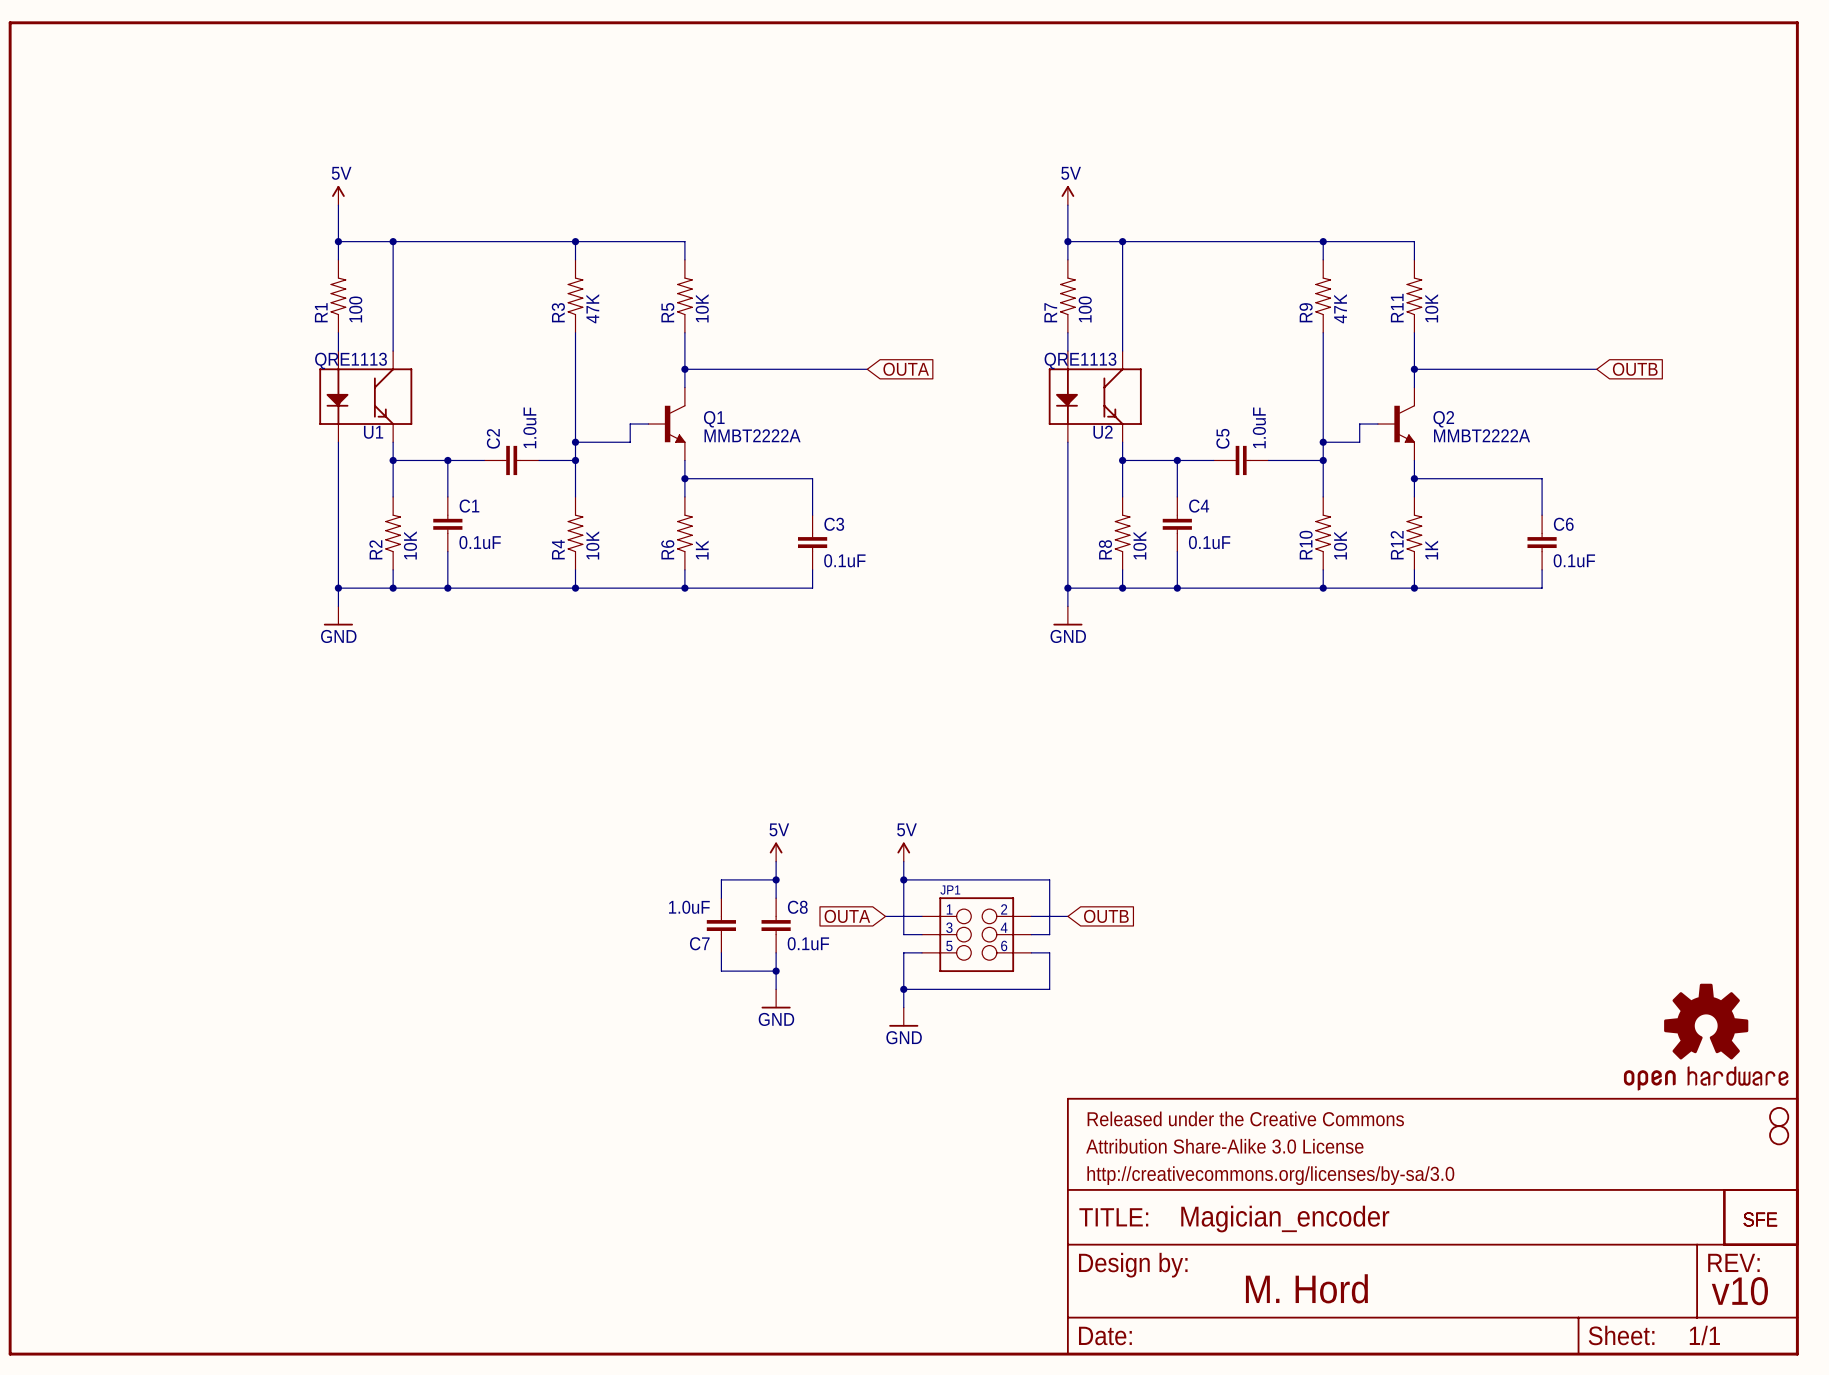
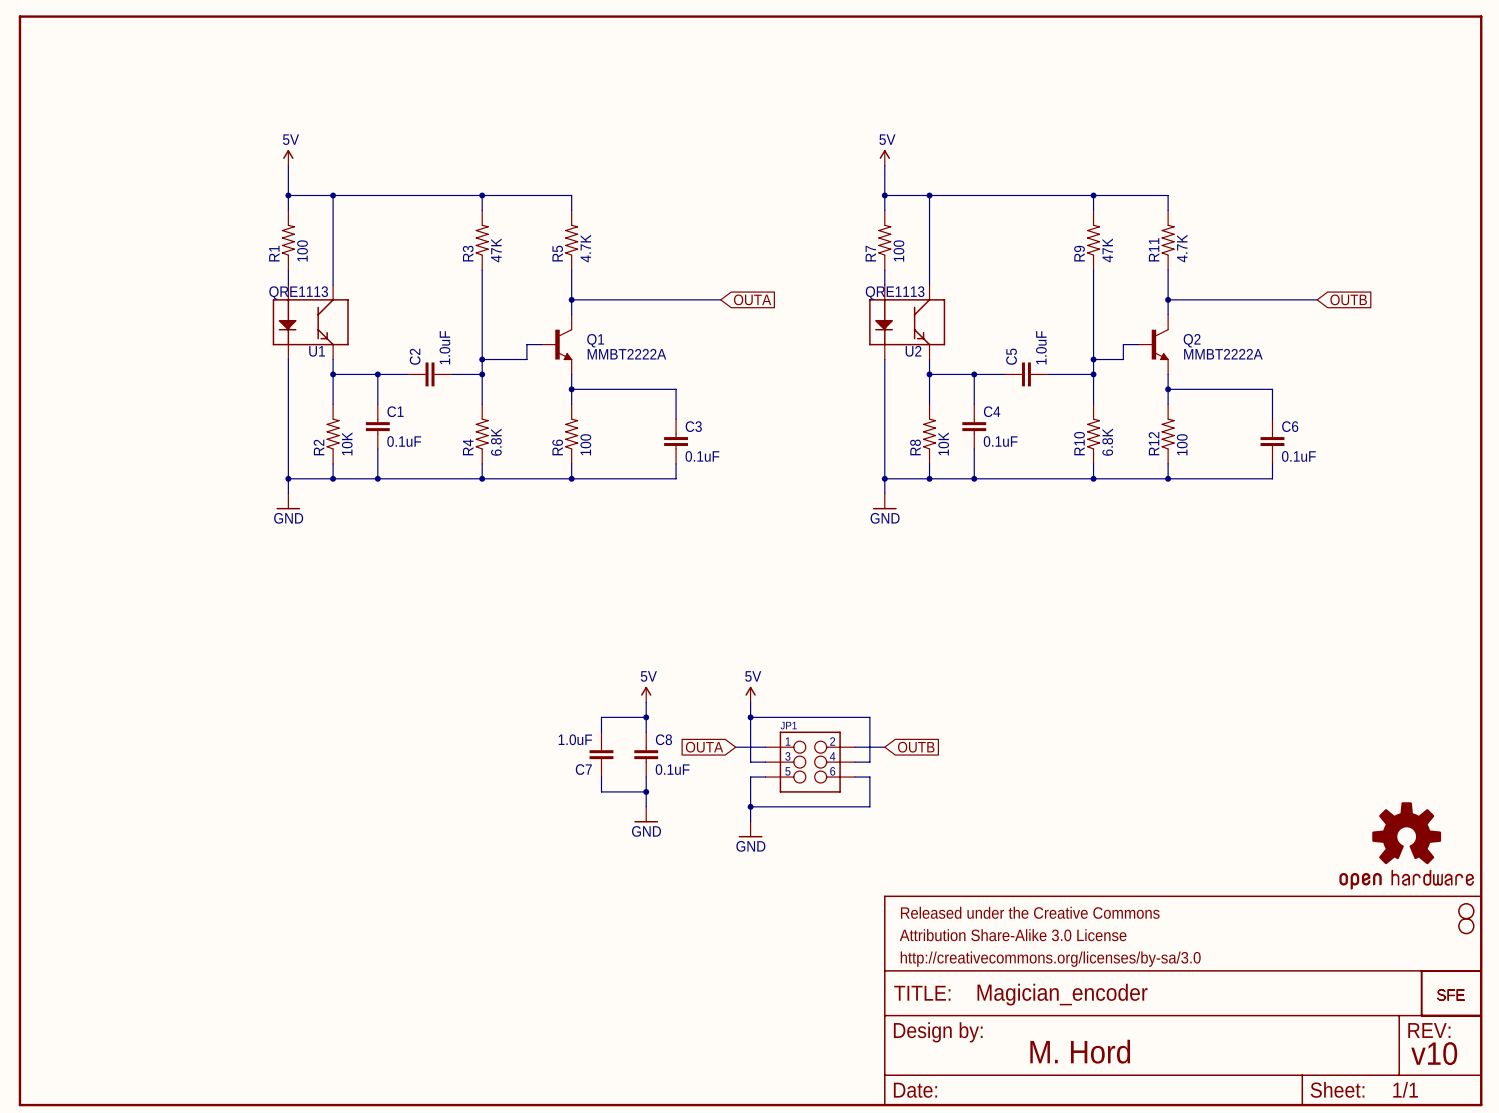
R5 value: 10K (702, 308) -> 4.7K (585, 248)
R11 value: 10K (1431, 308) -> 4.7K (1182, 248)
R4 value: 10K (592, 545) -> 6.8K (496, 442)
R10 value: 10K (1340, 545) -> 6.8K (1107, 442)
R6 value: 1K (702, 550) -> 100 (585, 444)
R12 value: 1K (1431, 550) -> 100 (1182, 444)

